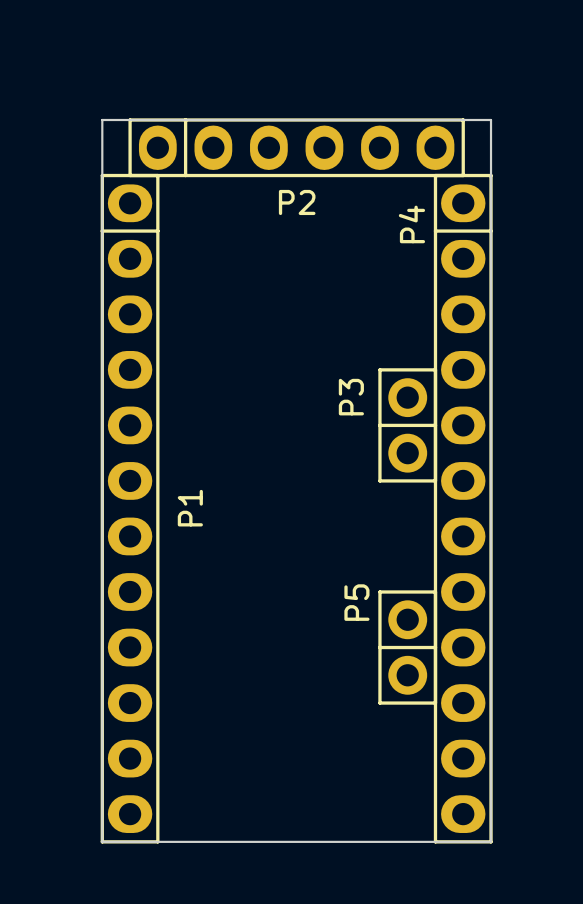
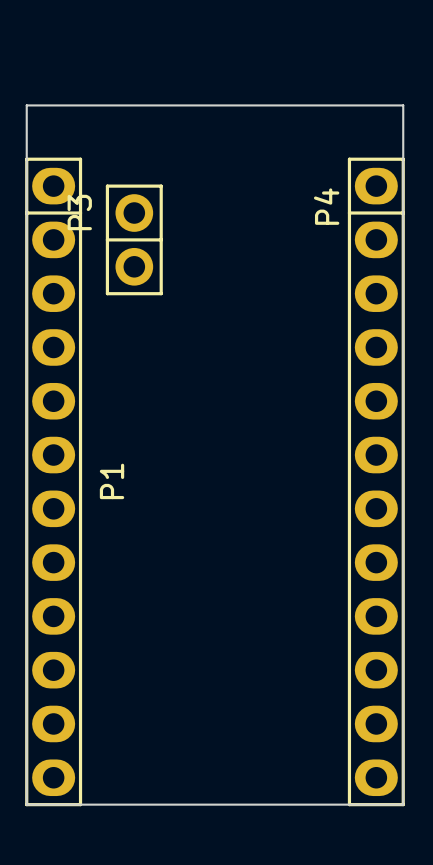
P2: (296, 147) -> none
P3 position: (407, 425) -> (134, 239)
P5: (407, 647) -> none

